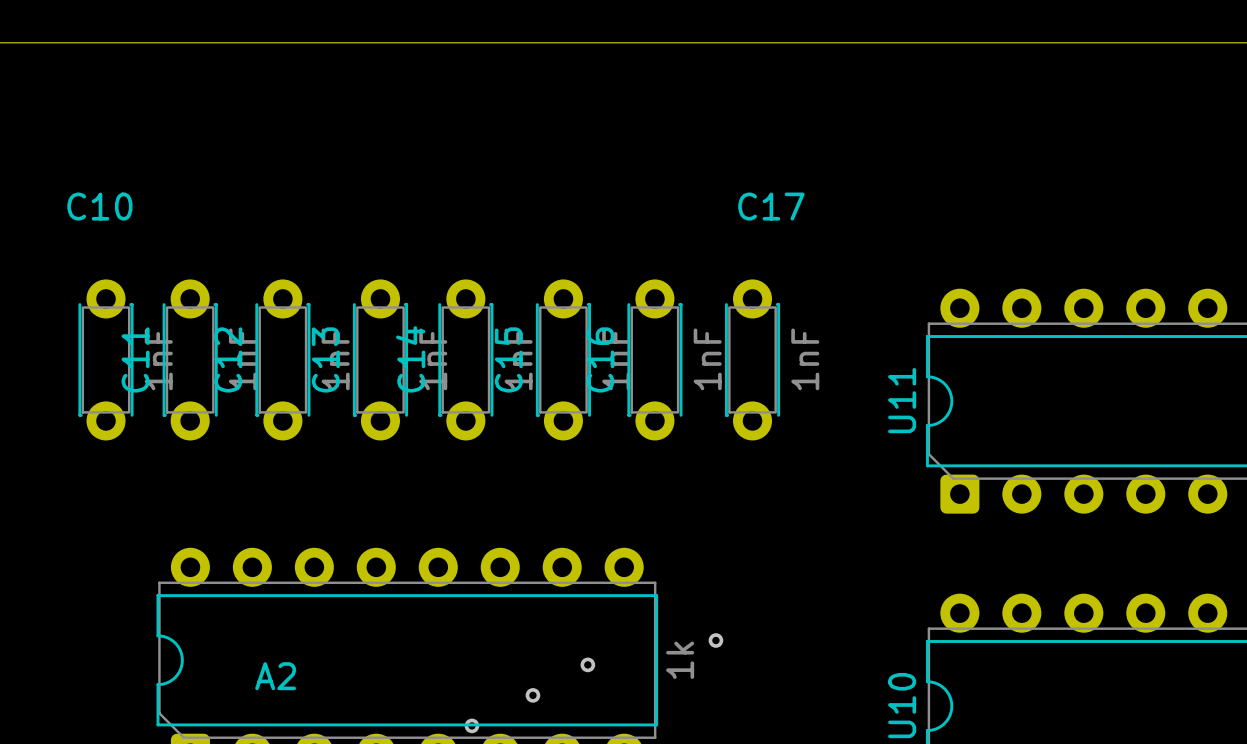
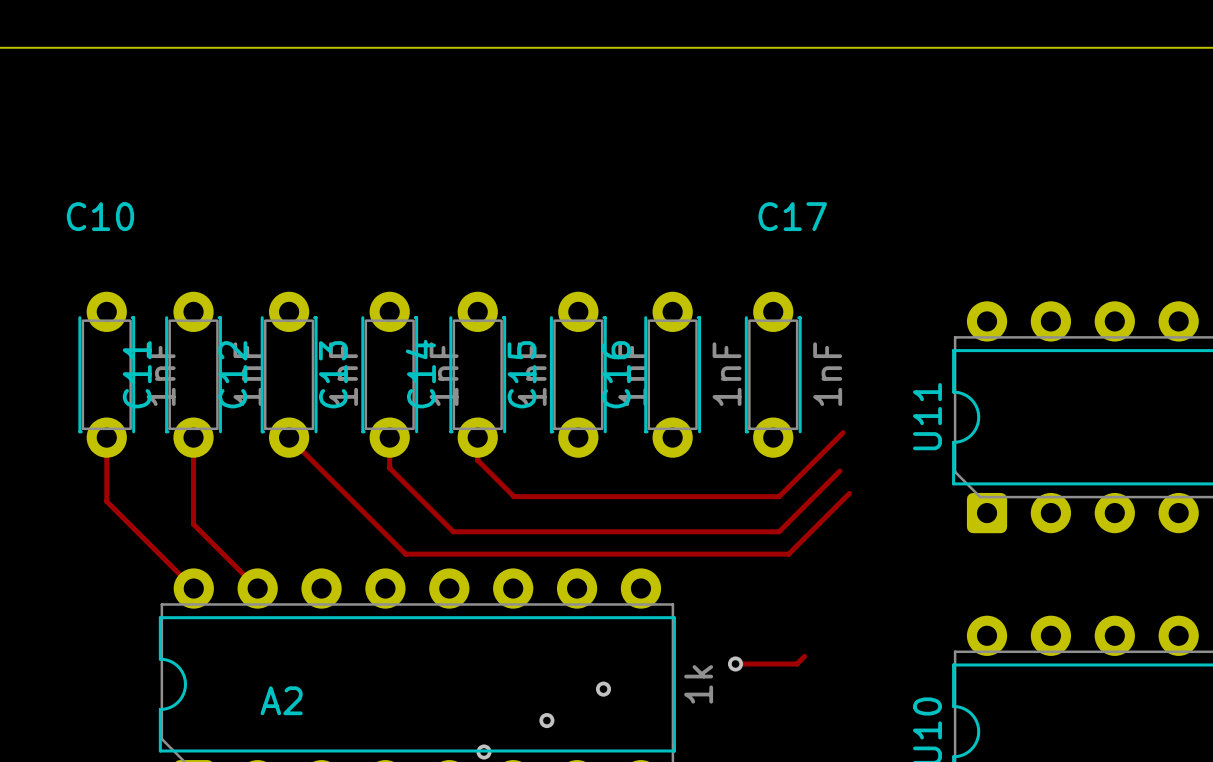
track: none -> (843, 432) (779, 496) (514, 496) (477, 460) (477, 437)
track: none -> (106, 437) (106, 501) (193, 588)
track: none -> (193, 437) (193, 524) (257, 588)
track: none -> (289, 437) (405, 554) (788, 554) (849, 493)
track: none -> (389, 437) (389, 468) (453, 531) (779, 531) (839, 471)
track: none -> (804, 656) (797, 663) (735, 663)

